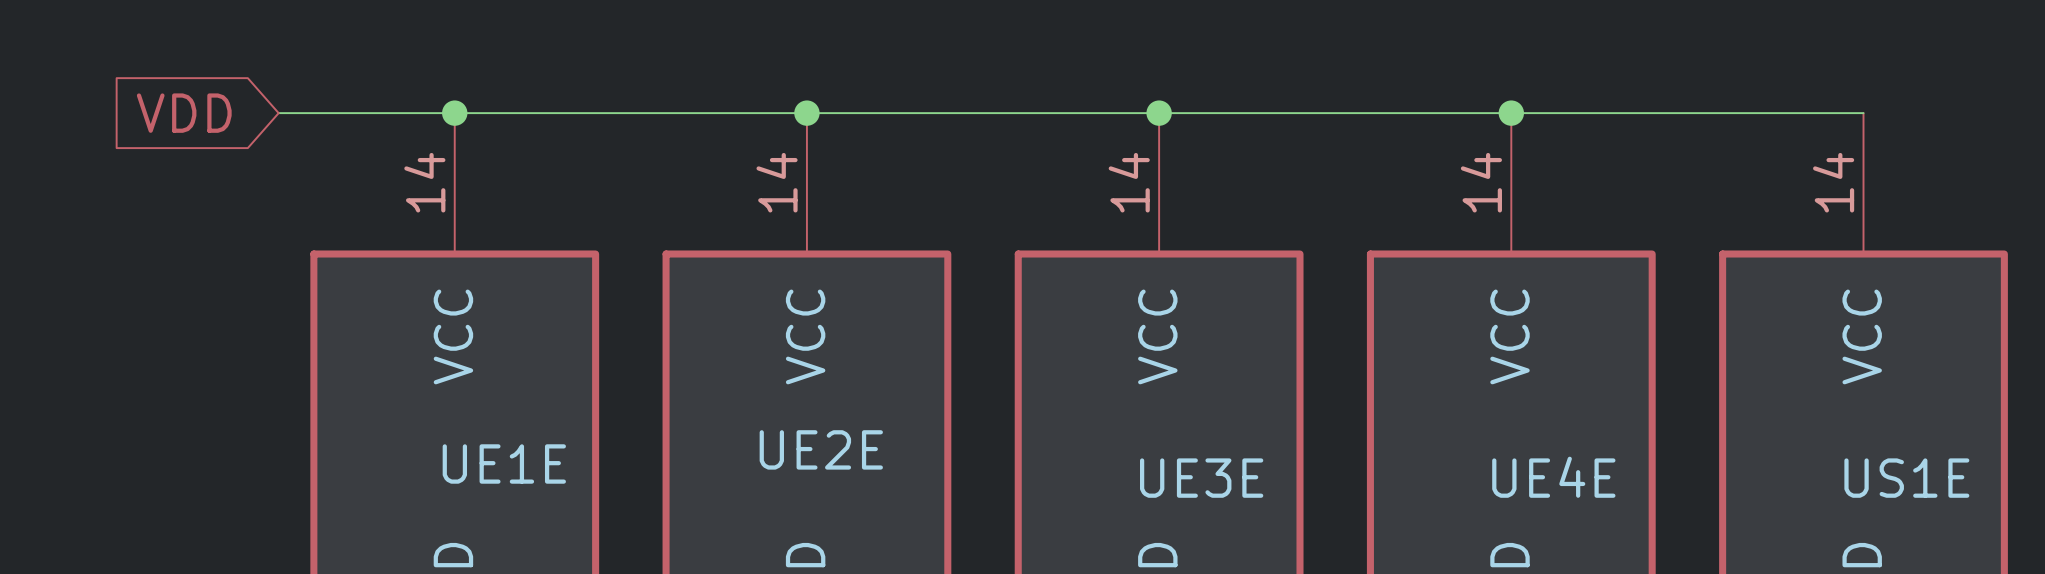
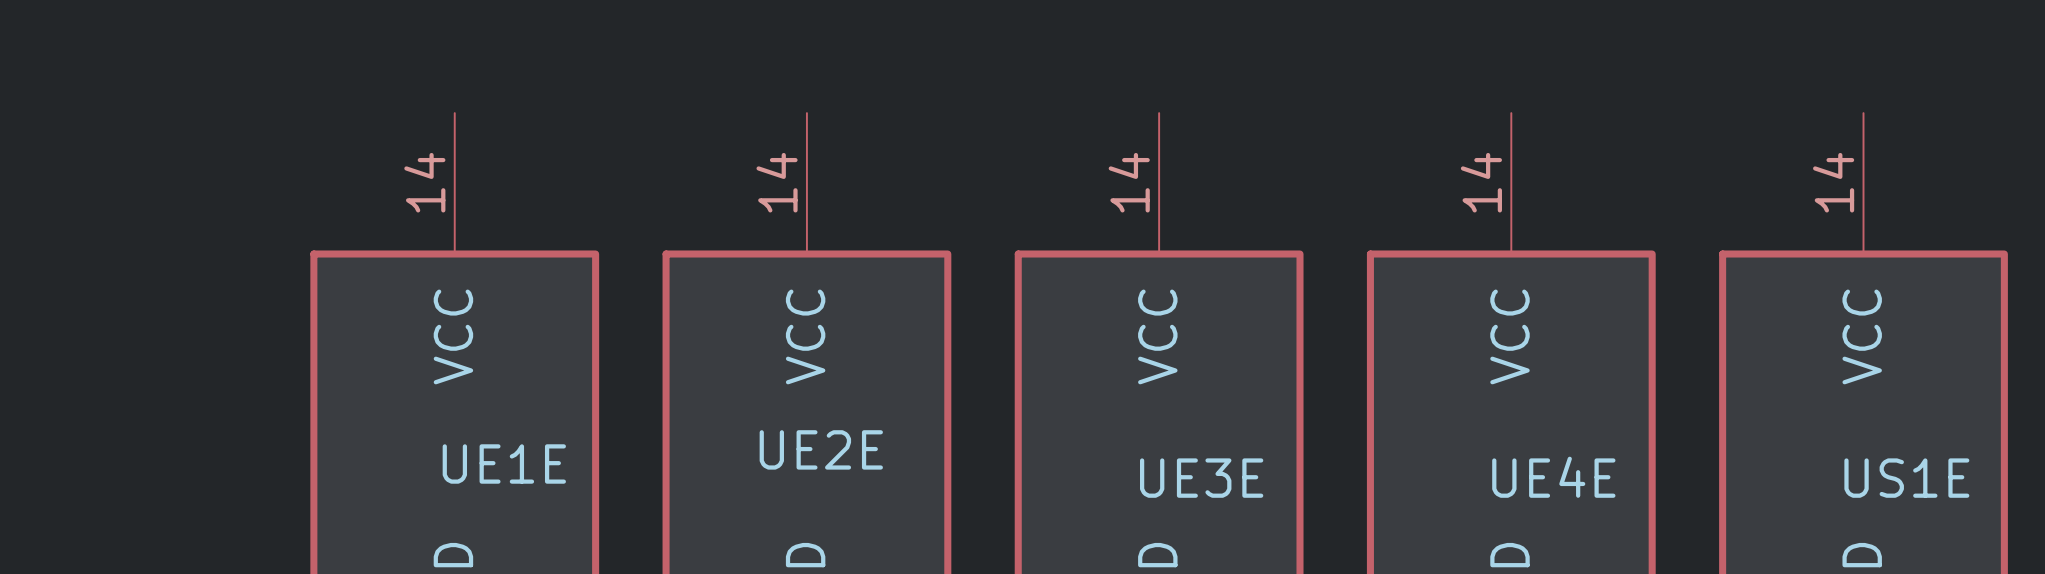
global label: VDD (184, 113) -> none
wire: (278, 113) (1863, 113) -> none
junction: (454, 113) -> none
junction: (806, 113) -> none
junction: (1159, 113) -> none
junction: (1511, 113) -> none

